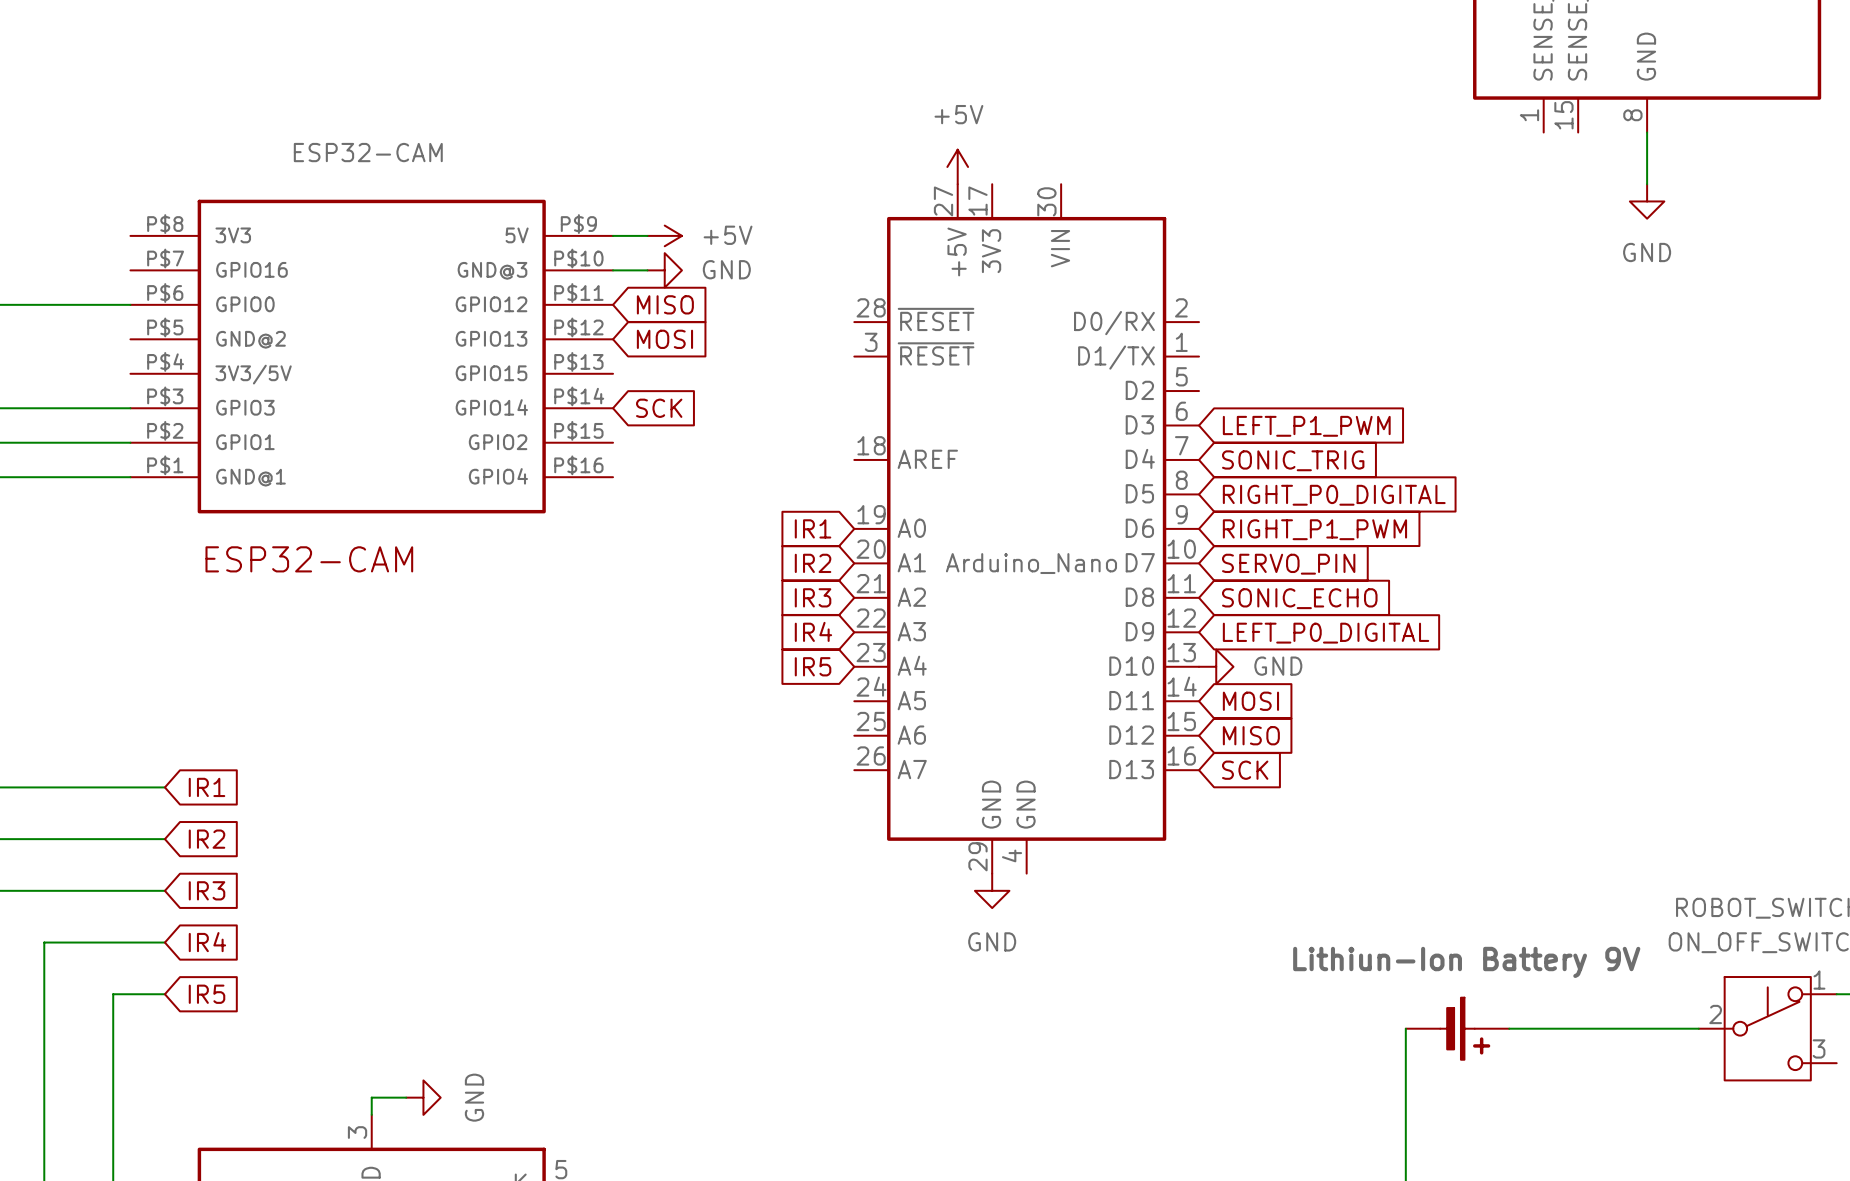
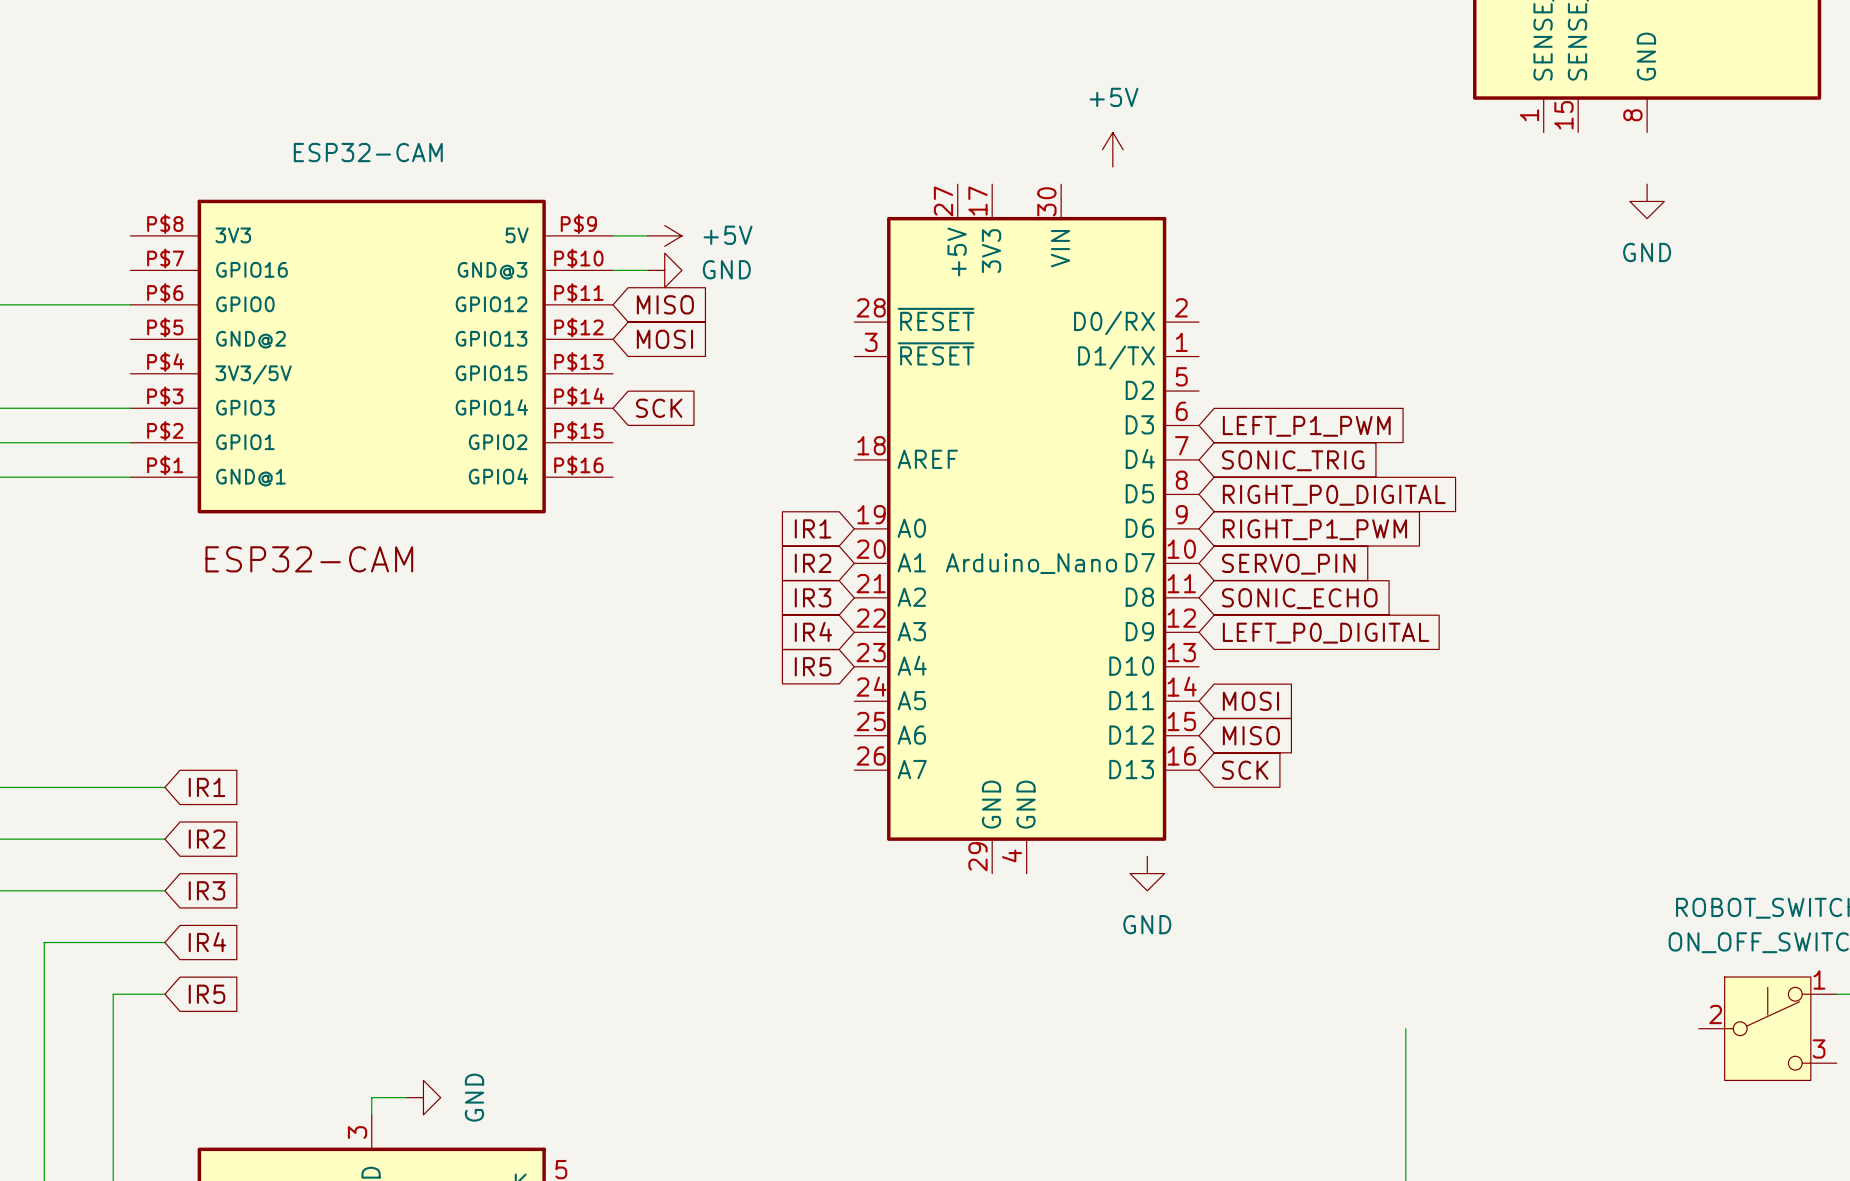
wire: (1647, 132) (1647, 184) -> none
power symbol position: +5V (957, 166) -> +5V (1112, 149)
power symbol: GND (1216, 666) -> none
power symbol: none -> GND (1147, 873)
power symbol: GND (992, 890) -> none
part: Lithiun-Ion Battery 9V (1457, 1028) -> none
wire: (1509, 1028) (1698, 1028) -> none

